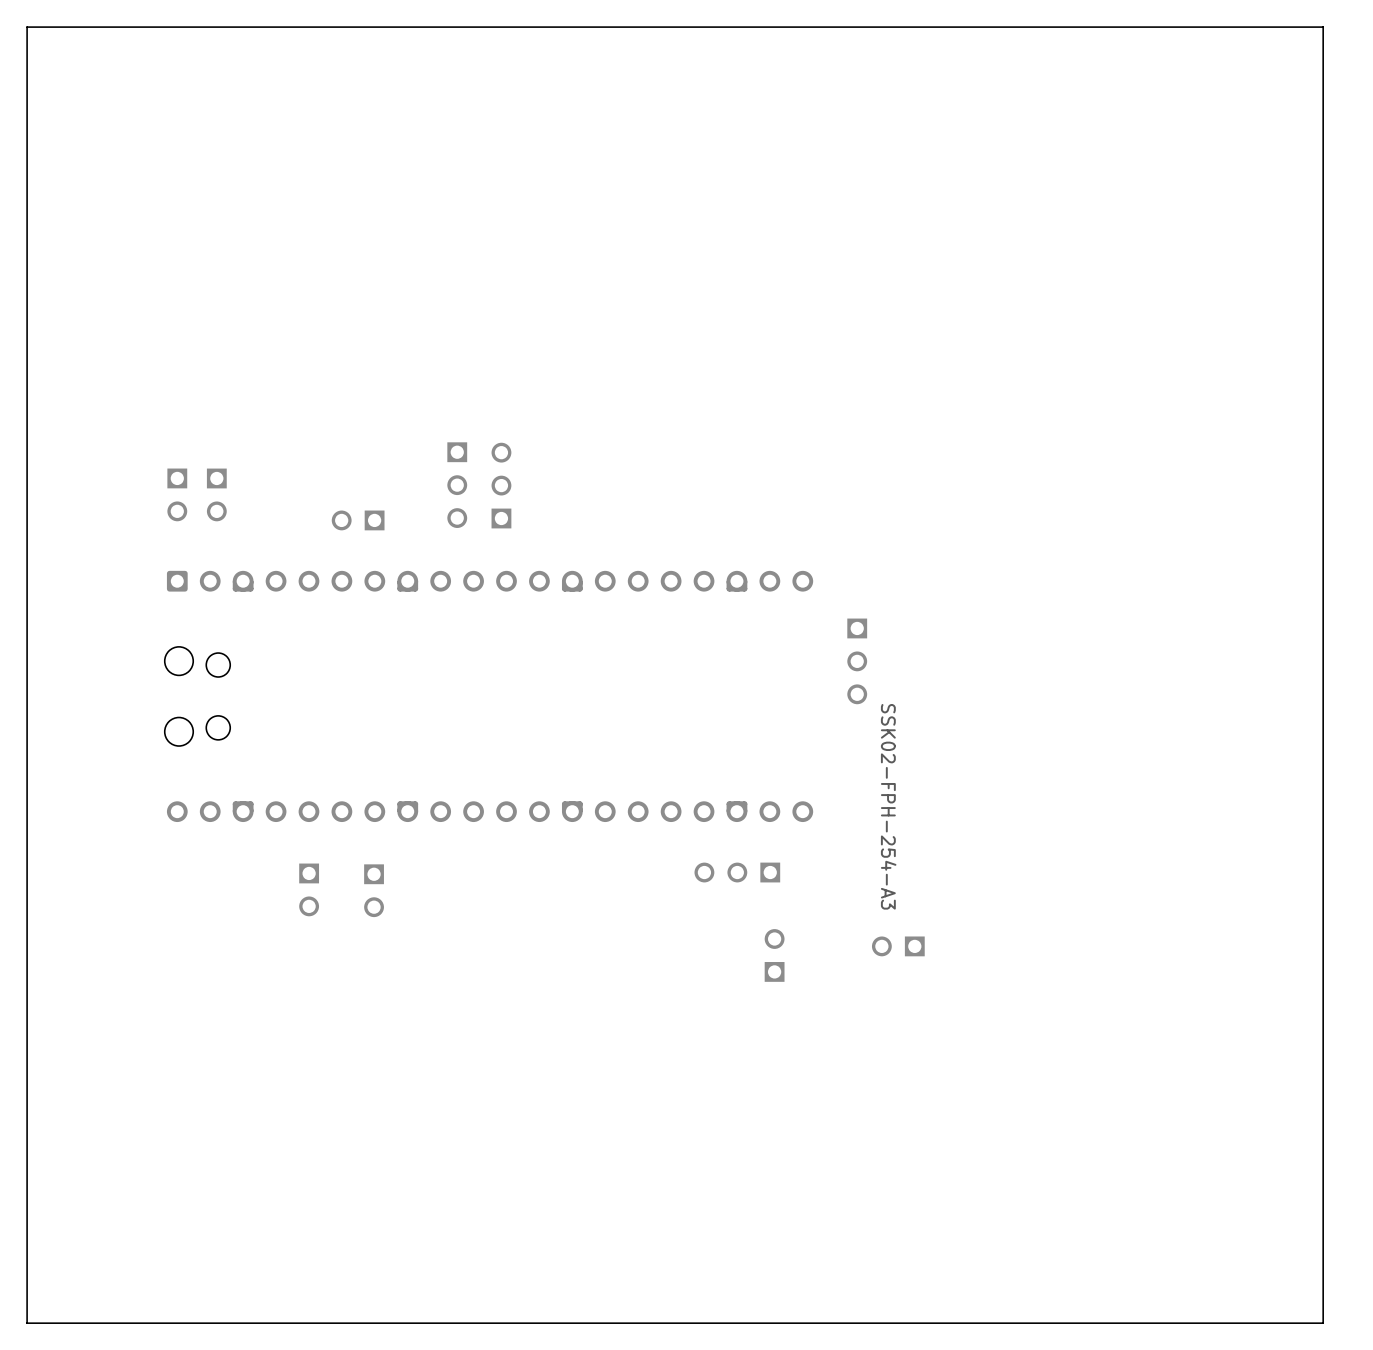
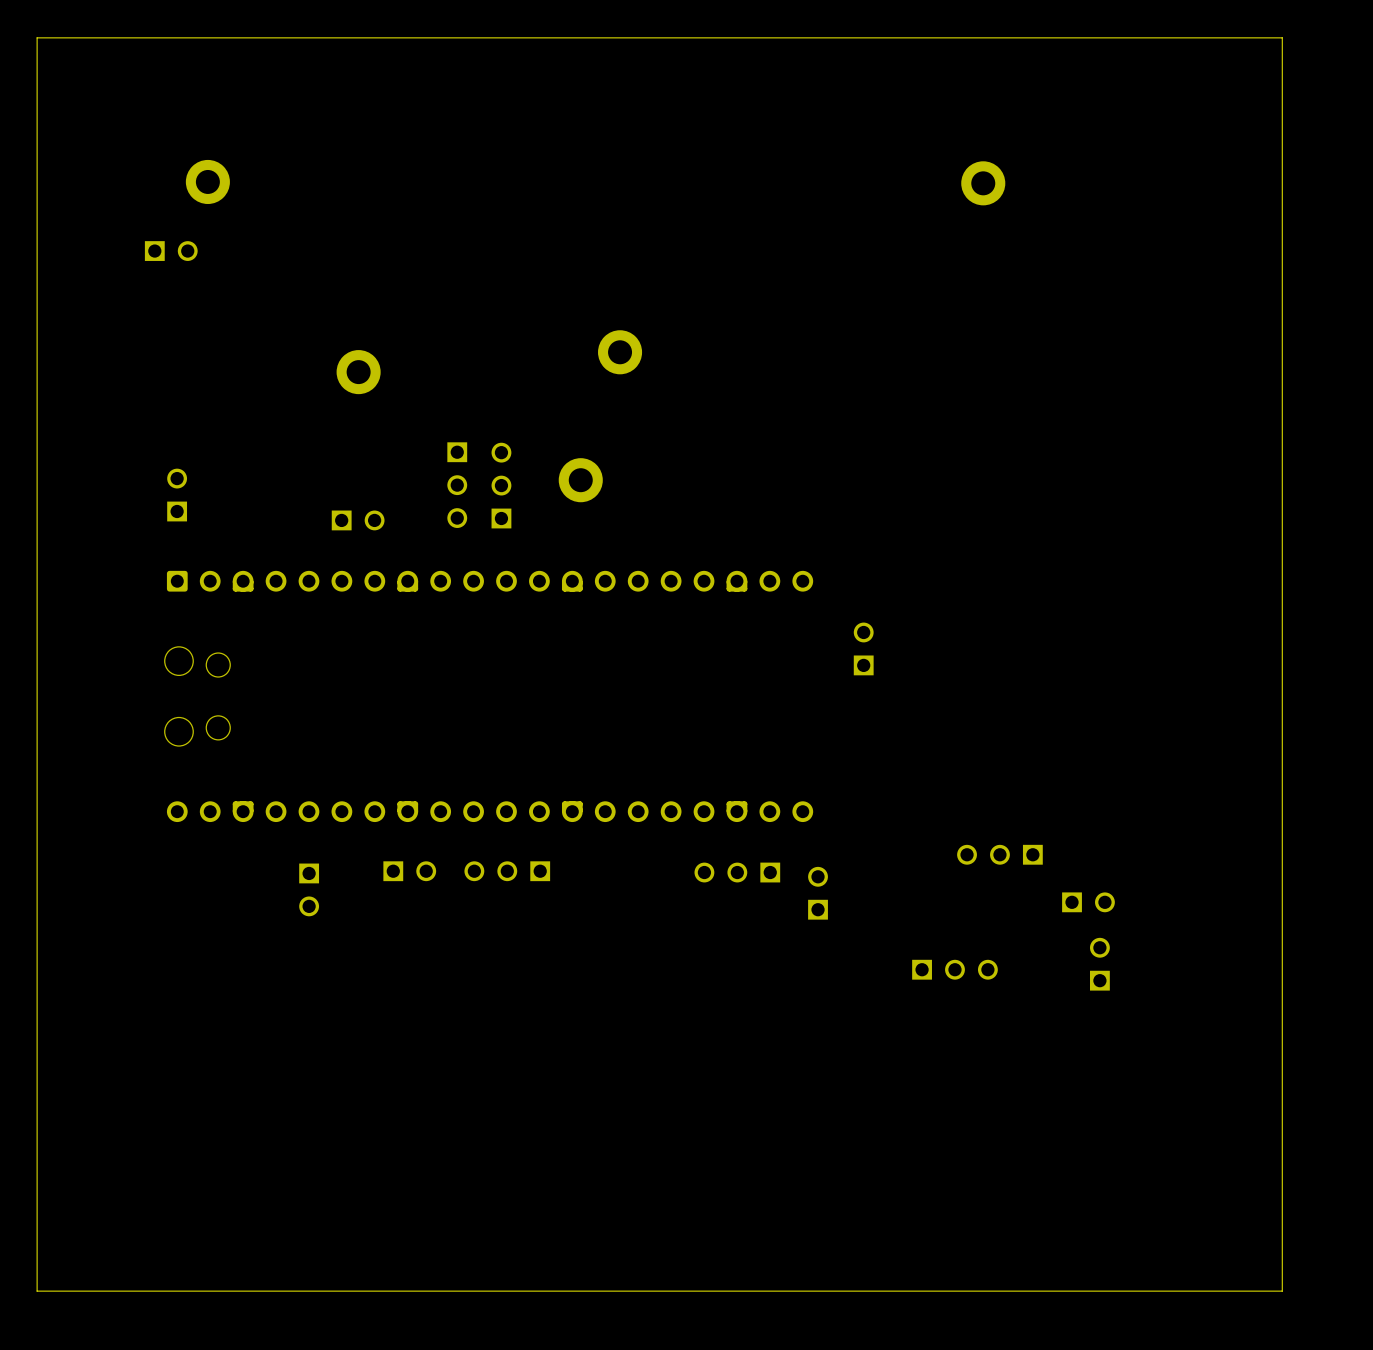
board edge: (1323, 27) (27, 27) (27, 1323) (1323, 1323) (1323, 27) -> (1282, 37) (1282, 1291) (37, 1291) (37, 37) (1282, 37)
part: none -> (207, 181)
part: none -> (983, 183)
part: none -> (171, 251)
part: none -> (620, 352)
part: none -> (358, 372)
part: none -> (580, 480)
part rotation: 0° (177, 494) -> 180° (177, 495)
part: (216, 494) -> none
part rotation: 0° (358, 520) -> 180° (358, 520)
part: none -> (863, 648)
part: SSK02-FPH-254-A3 (857, 661) -> none
part: none -> (999, 854)
part: none -> (507, 871)
part rotation: 0° (374, 890) -> 90° counterclockwise (409, 871)
part position: (374, 890) -> (409, 871)
part: none -> (818, 893)
part: none -> (1088, 902)
part: (898, 946) -> none
part: (774, 955) -> none
part: none -> (1099, 964)
part: none -> (954, 969)

